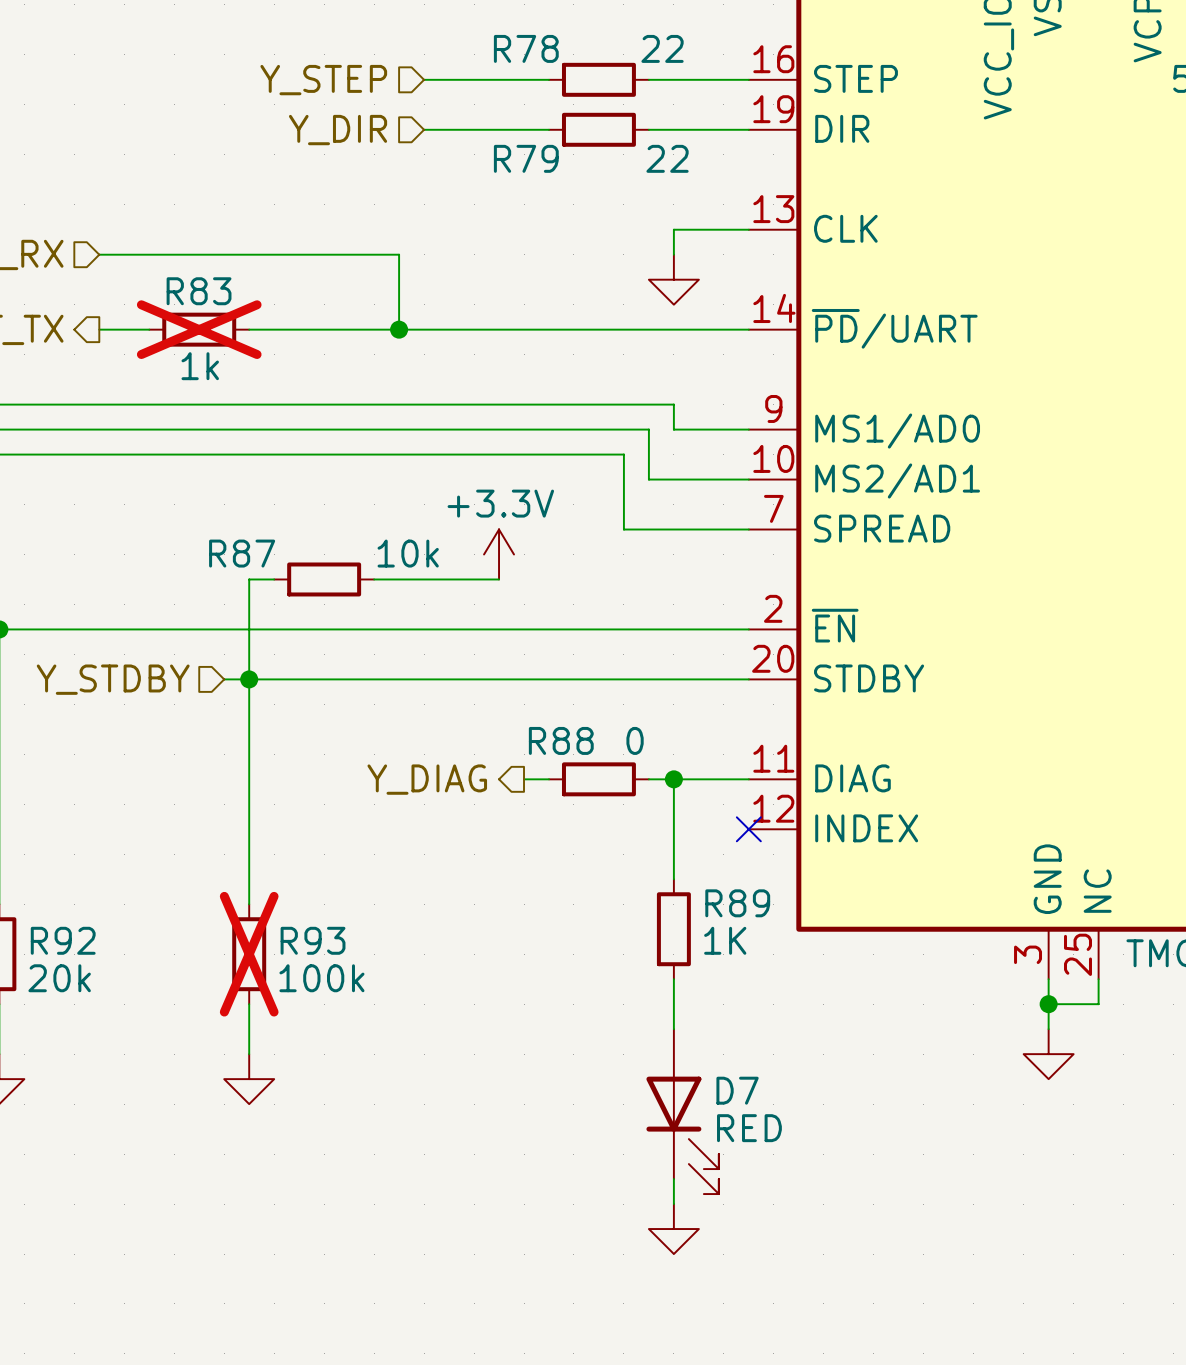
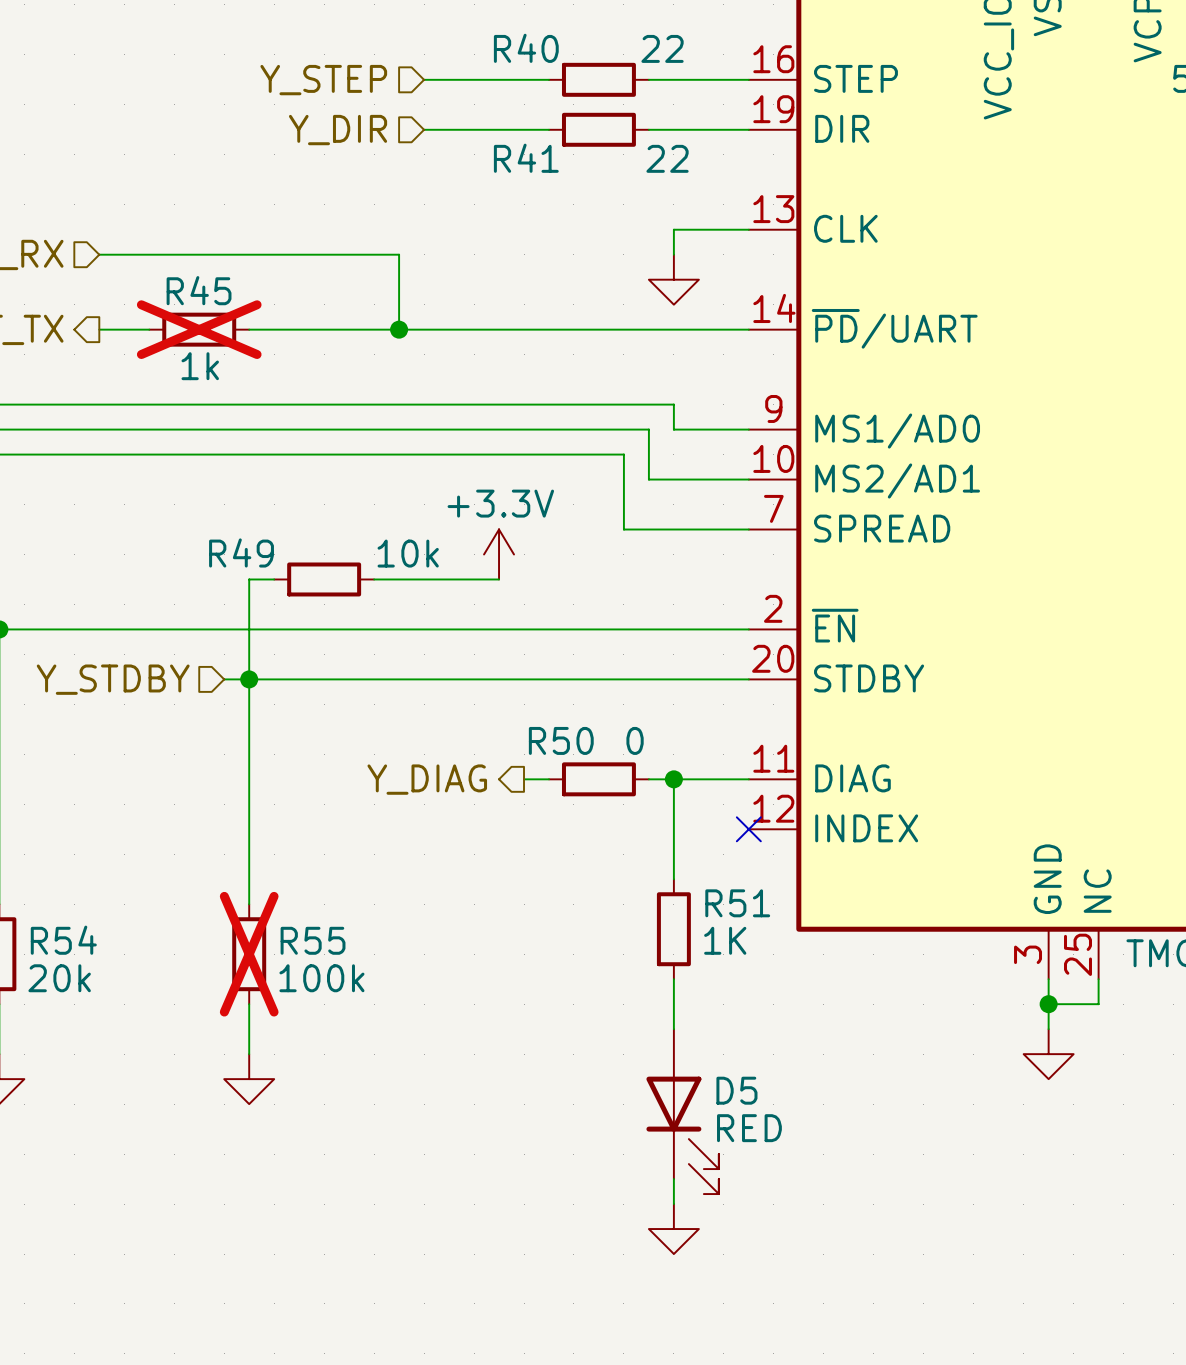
R78 name: R78 (526, 48) -> R40 (526, 48)
R79 name: R79 (526, 158) -> R41 (526, 158)
R83 name: R83 (199, 291) -> R45 (199, 290)
R87 name: R87 (242, 553) -> R49 (241, 552)
R88 name: R88 (561, 740) -> R50 (561, 740)
R89 name: R89 (737, 903) -> R51 (737, 903)
R92 name: R92 (63, 940) -> R54 (63, 940)
R93 name: R93 (313, 940) -> R55 (313, 940)
D7 name: D7 (737, 1090) -> D5 (736, 1090)

